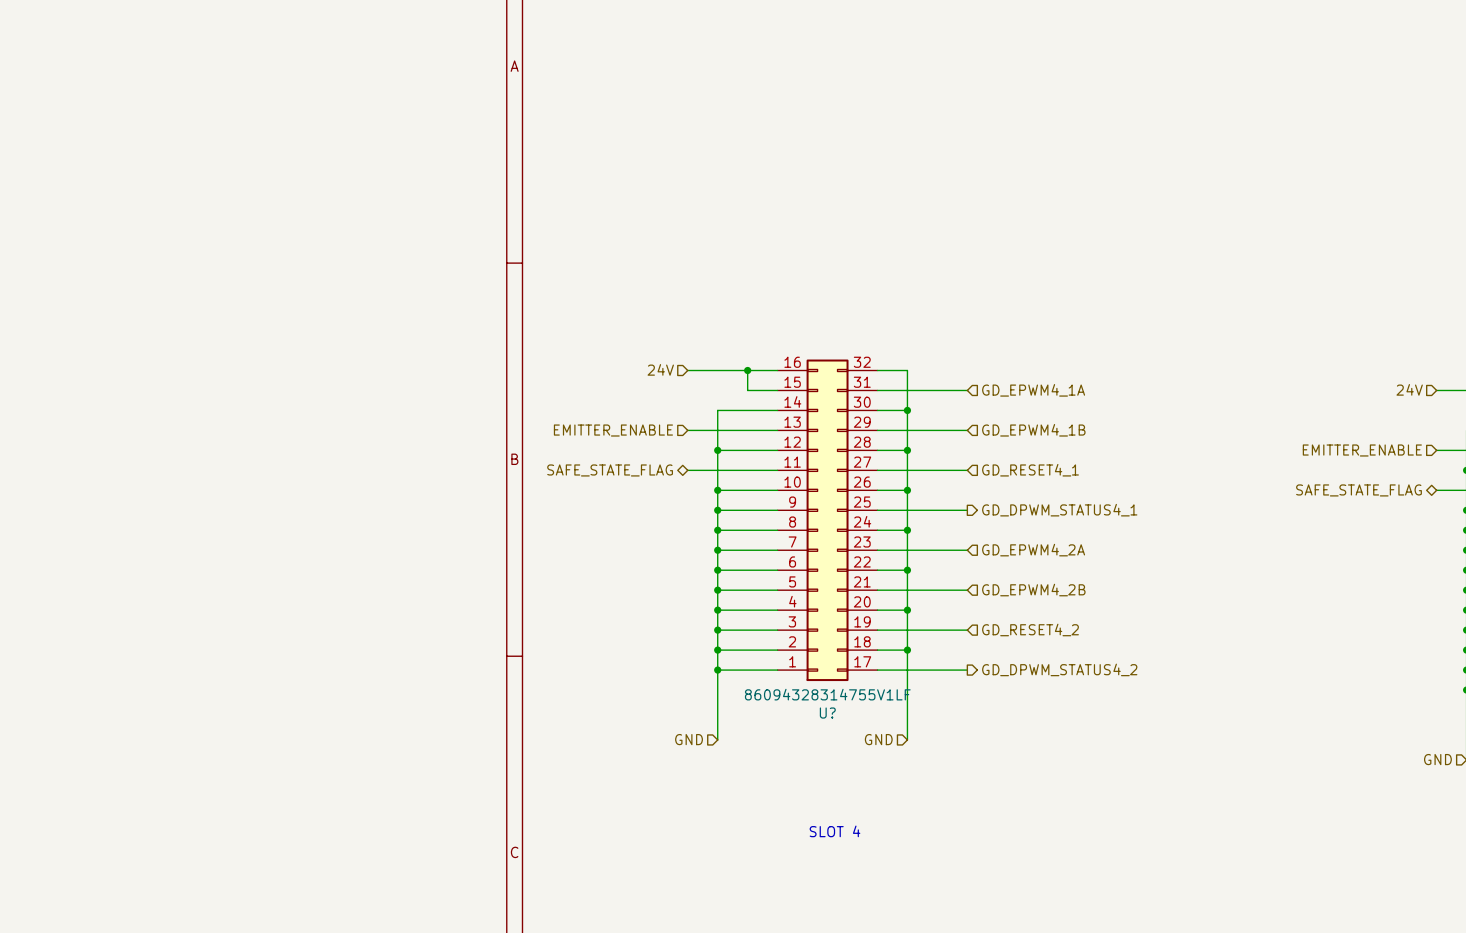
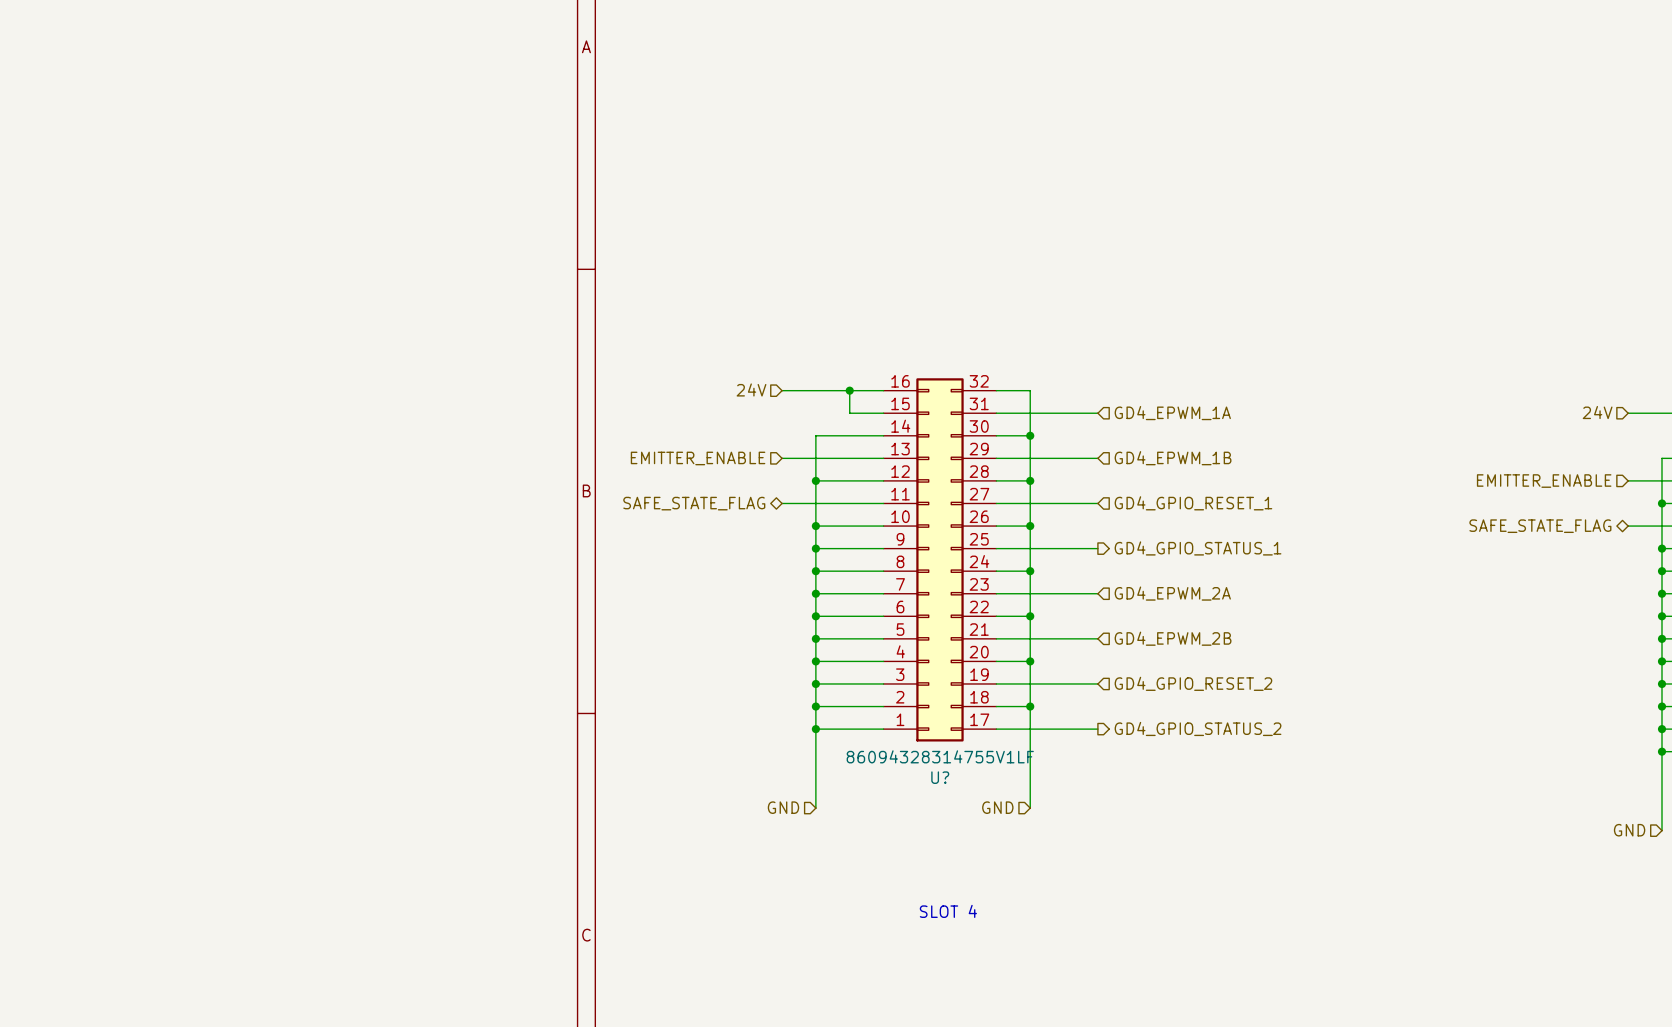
hierarchical label: GD_EPWM4_1A (1033, 390) -> GD4_EPWM_1A (1172, 413)
hierarchical label: GD_EPWM4_1B (1033, 430) -> GD4_EPWM_1B (1173, 458)
hierarchical label: GD_RESET4_1 (1030, 470) -> GD4_GPIO_RESET_1 (1193, 503)
hierarchical label: GD_DPWM_STATUS4_1 (1059, 510) -> GD4_GPIO_STATUS_1 (1198, 548)
hierarchical label: GD_EPWM4_2A (1033, 550) -> GD4_EPWM_2A (1172, 593)
hierarchical label: GD_EPWM4_2B (1033, 590) -> GD4_EPWM_2B (1173, 638)
hierarchical label: GD_RESET4_2 (1030, 629) -> GD4_GPIO_RESET_2 (1193, 683)
hierarchical label: GD_DPWM_STATUS4_2 (1059, 669) -> GD4_GPIO_STATUS_2 (1198, 728)

